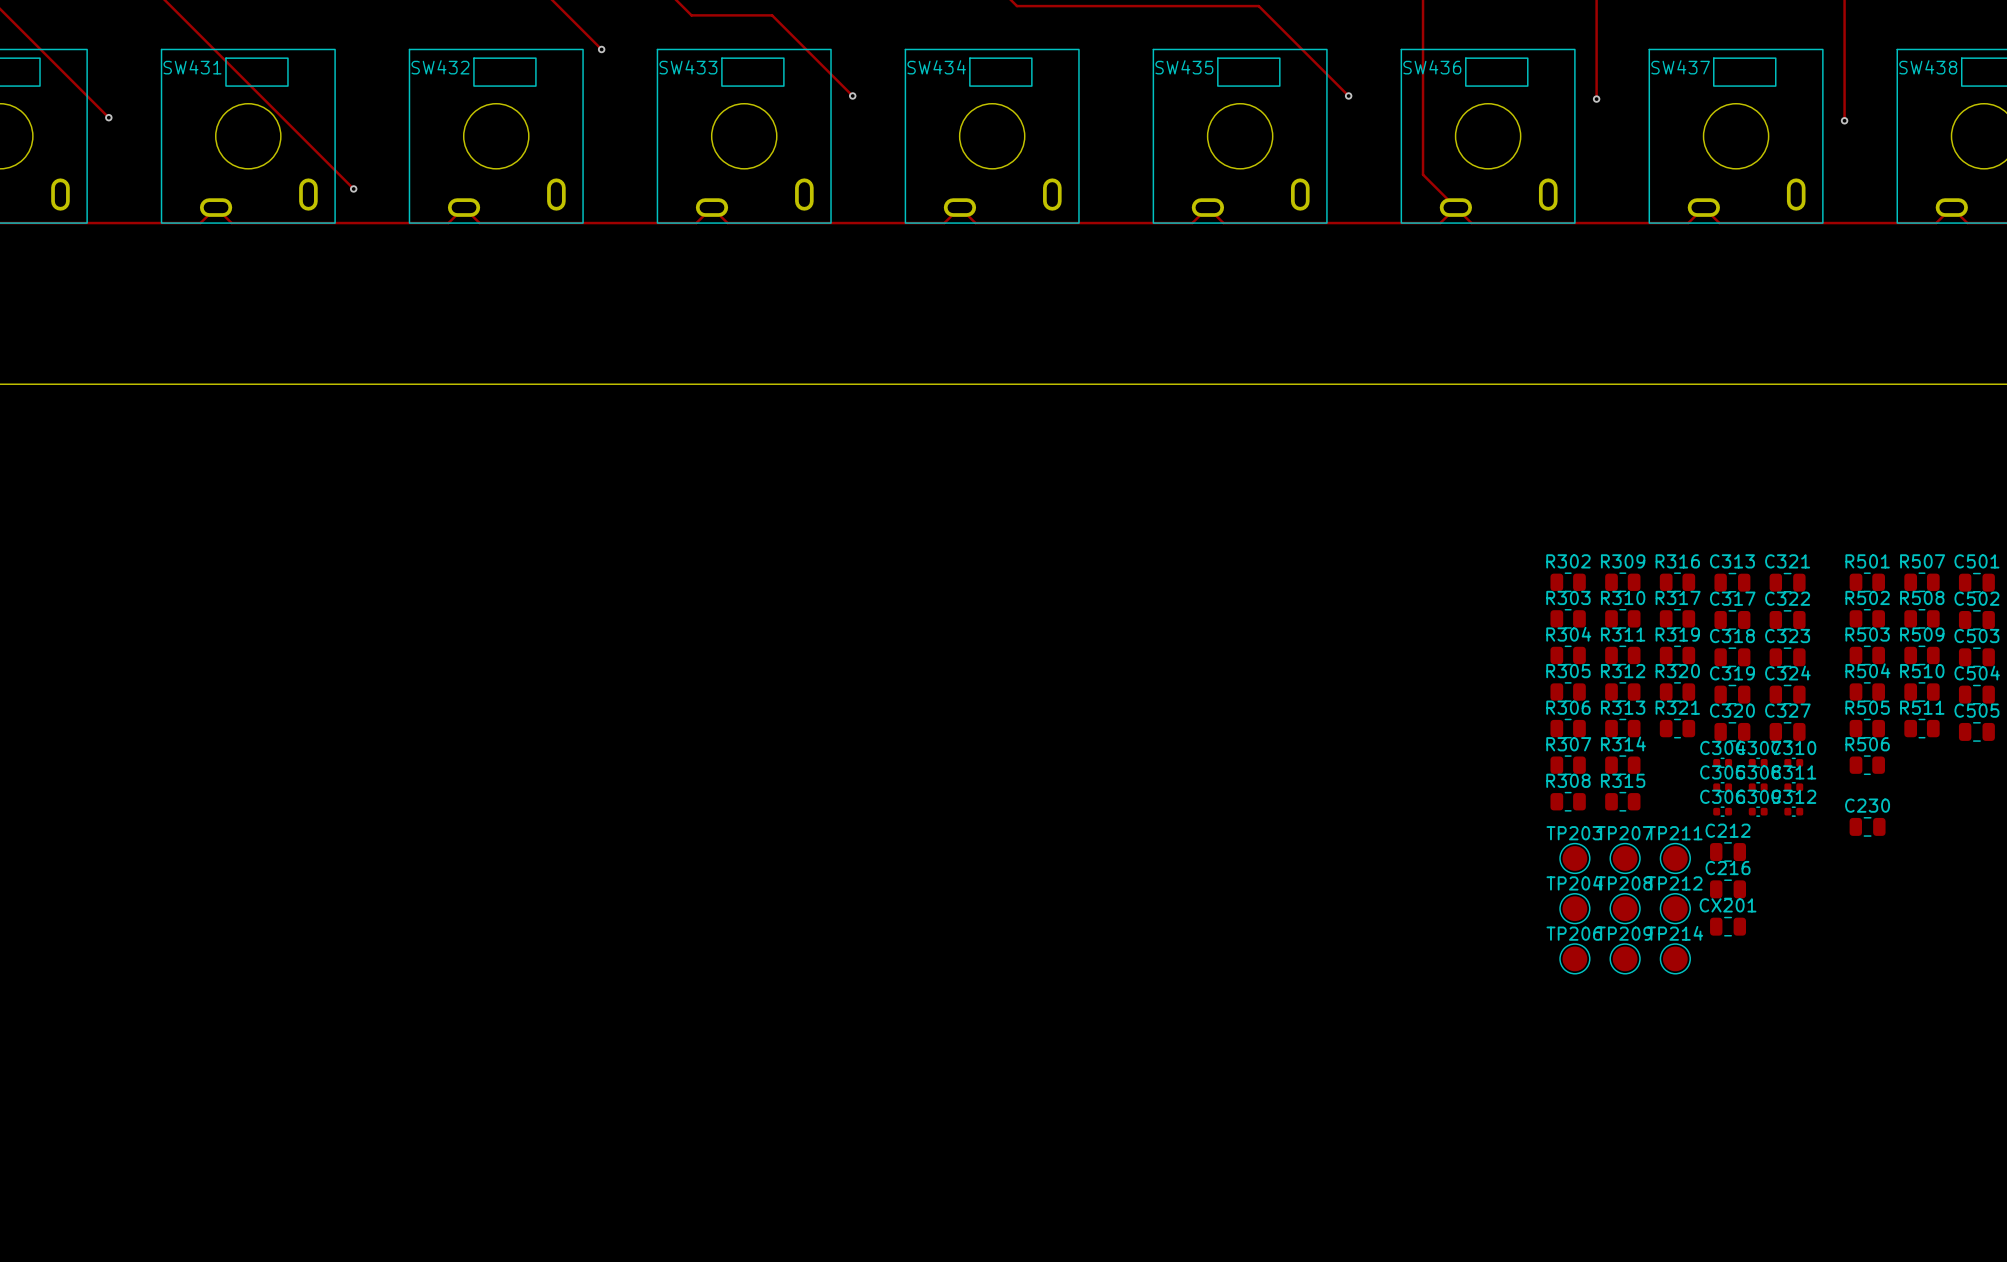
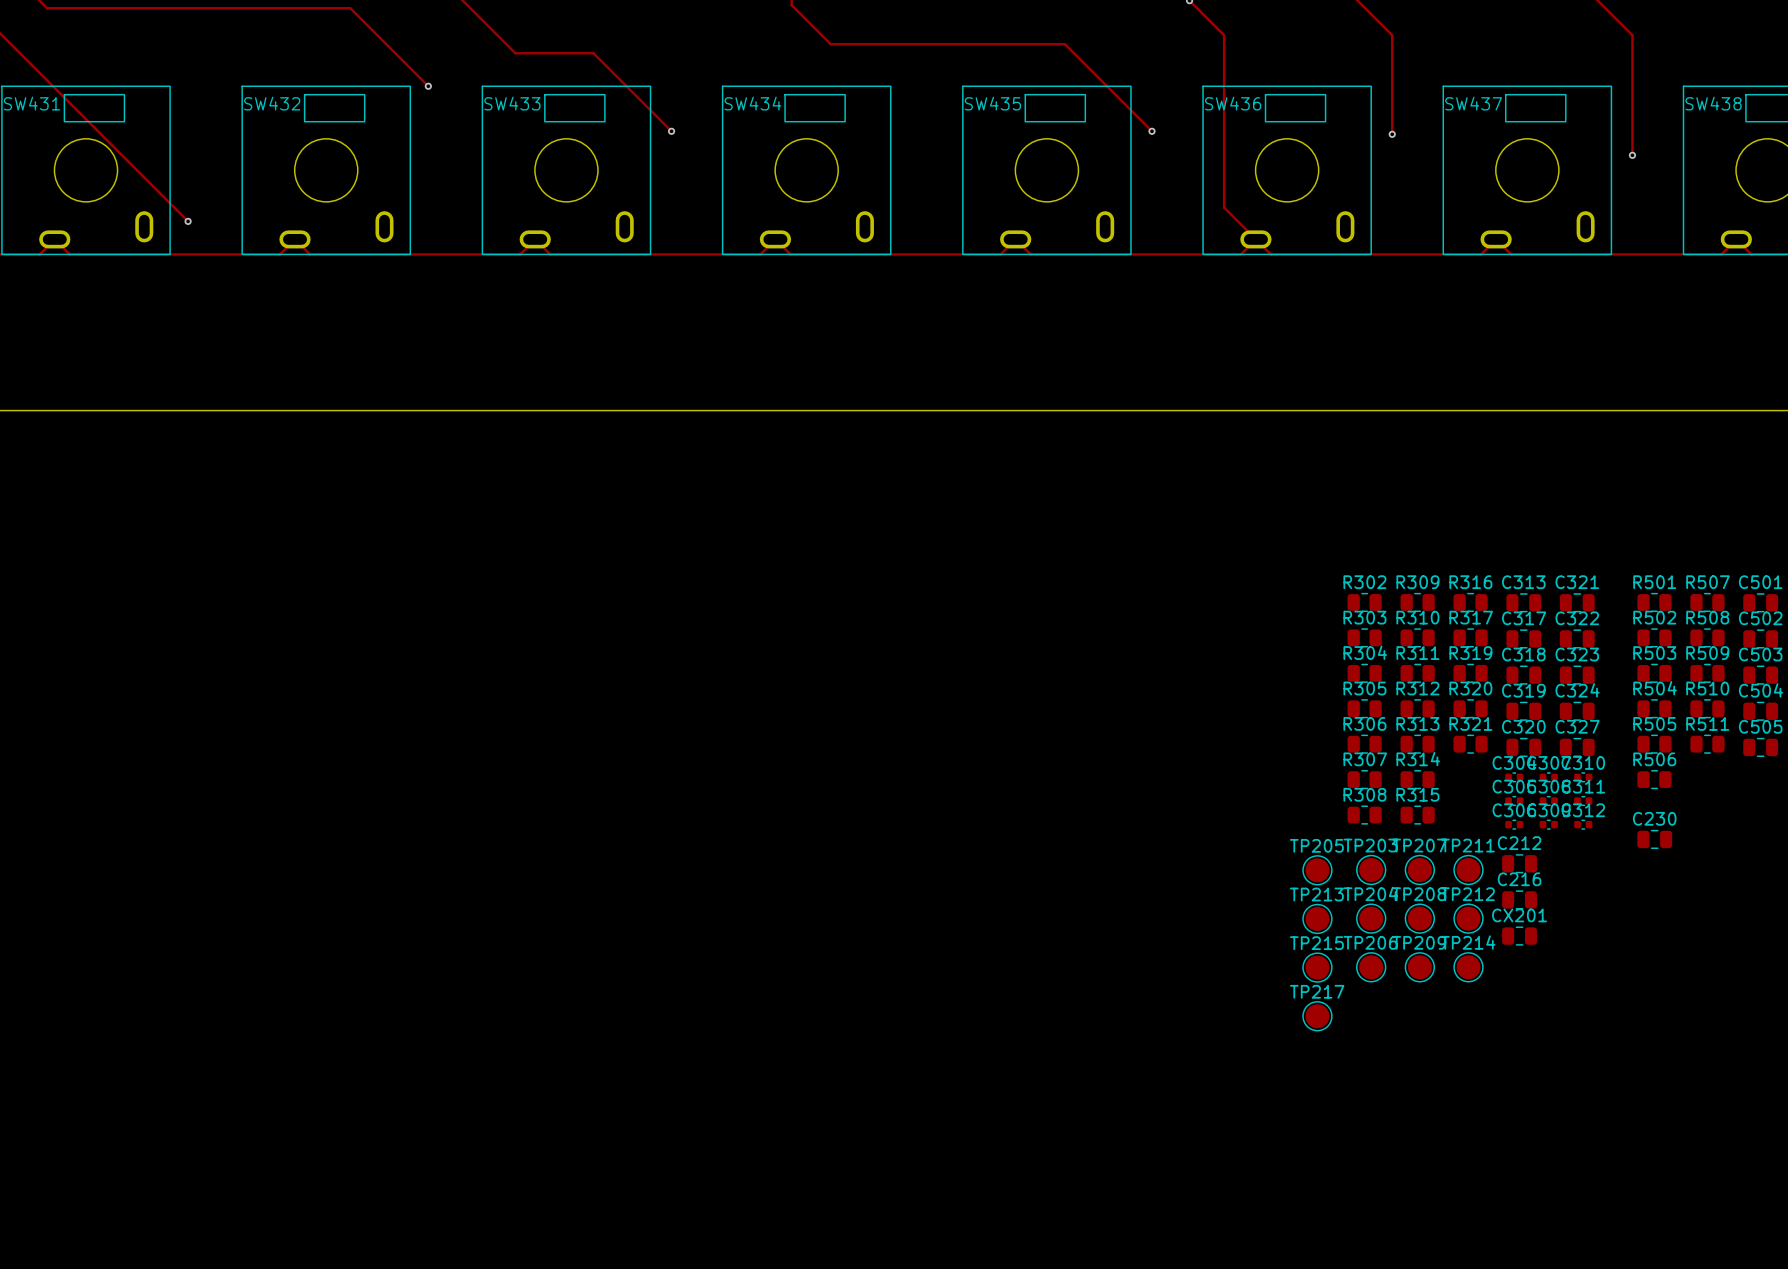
TP205: none -> (1317, 870)
TP213: none -> (1317, 918)
TP215: none -> (1317, 967)
TP217: none -> (1317, 1016)

